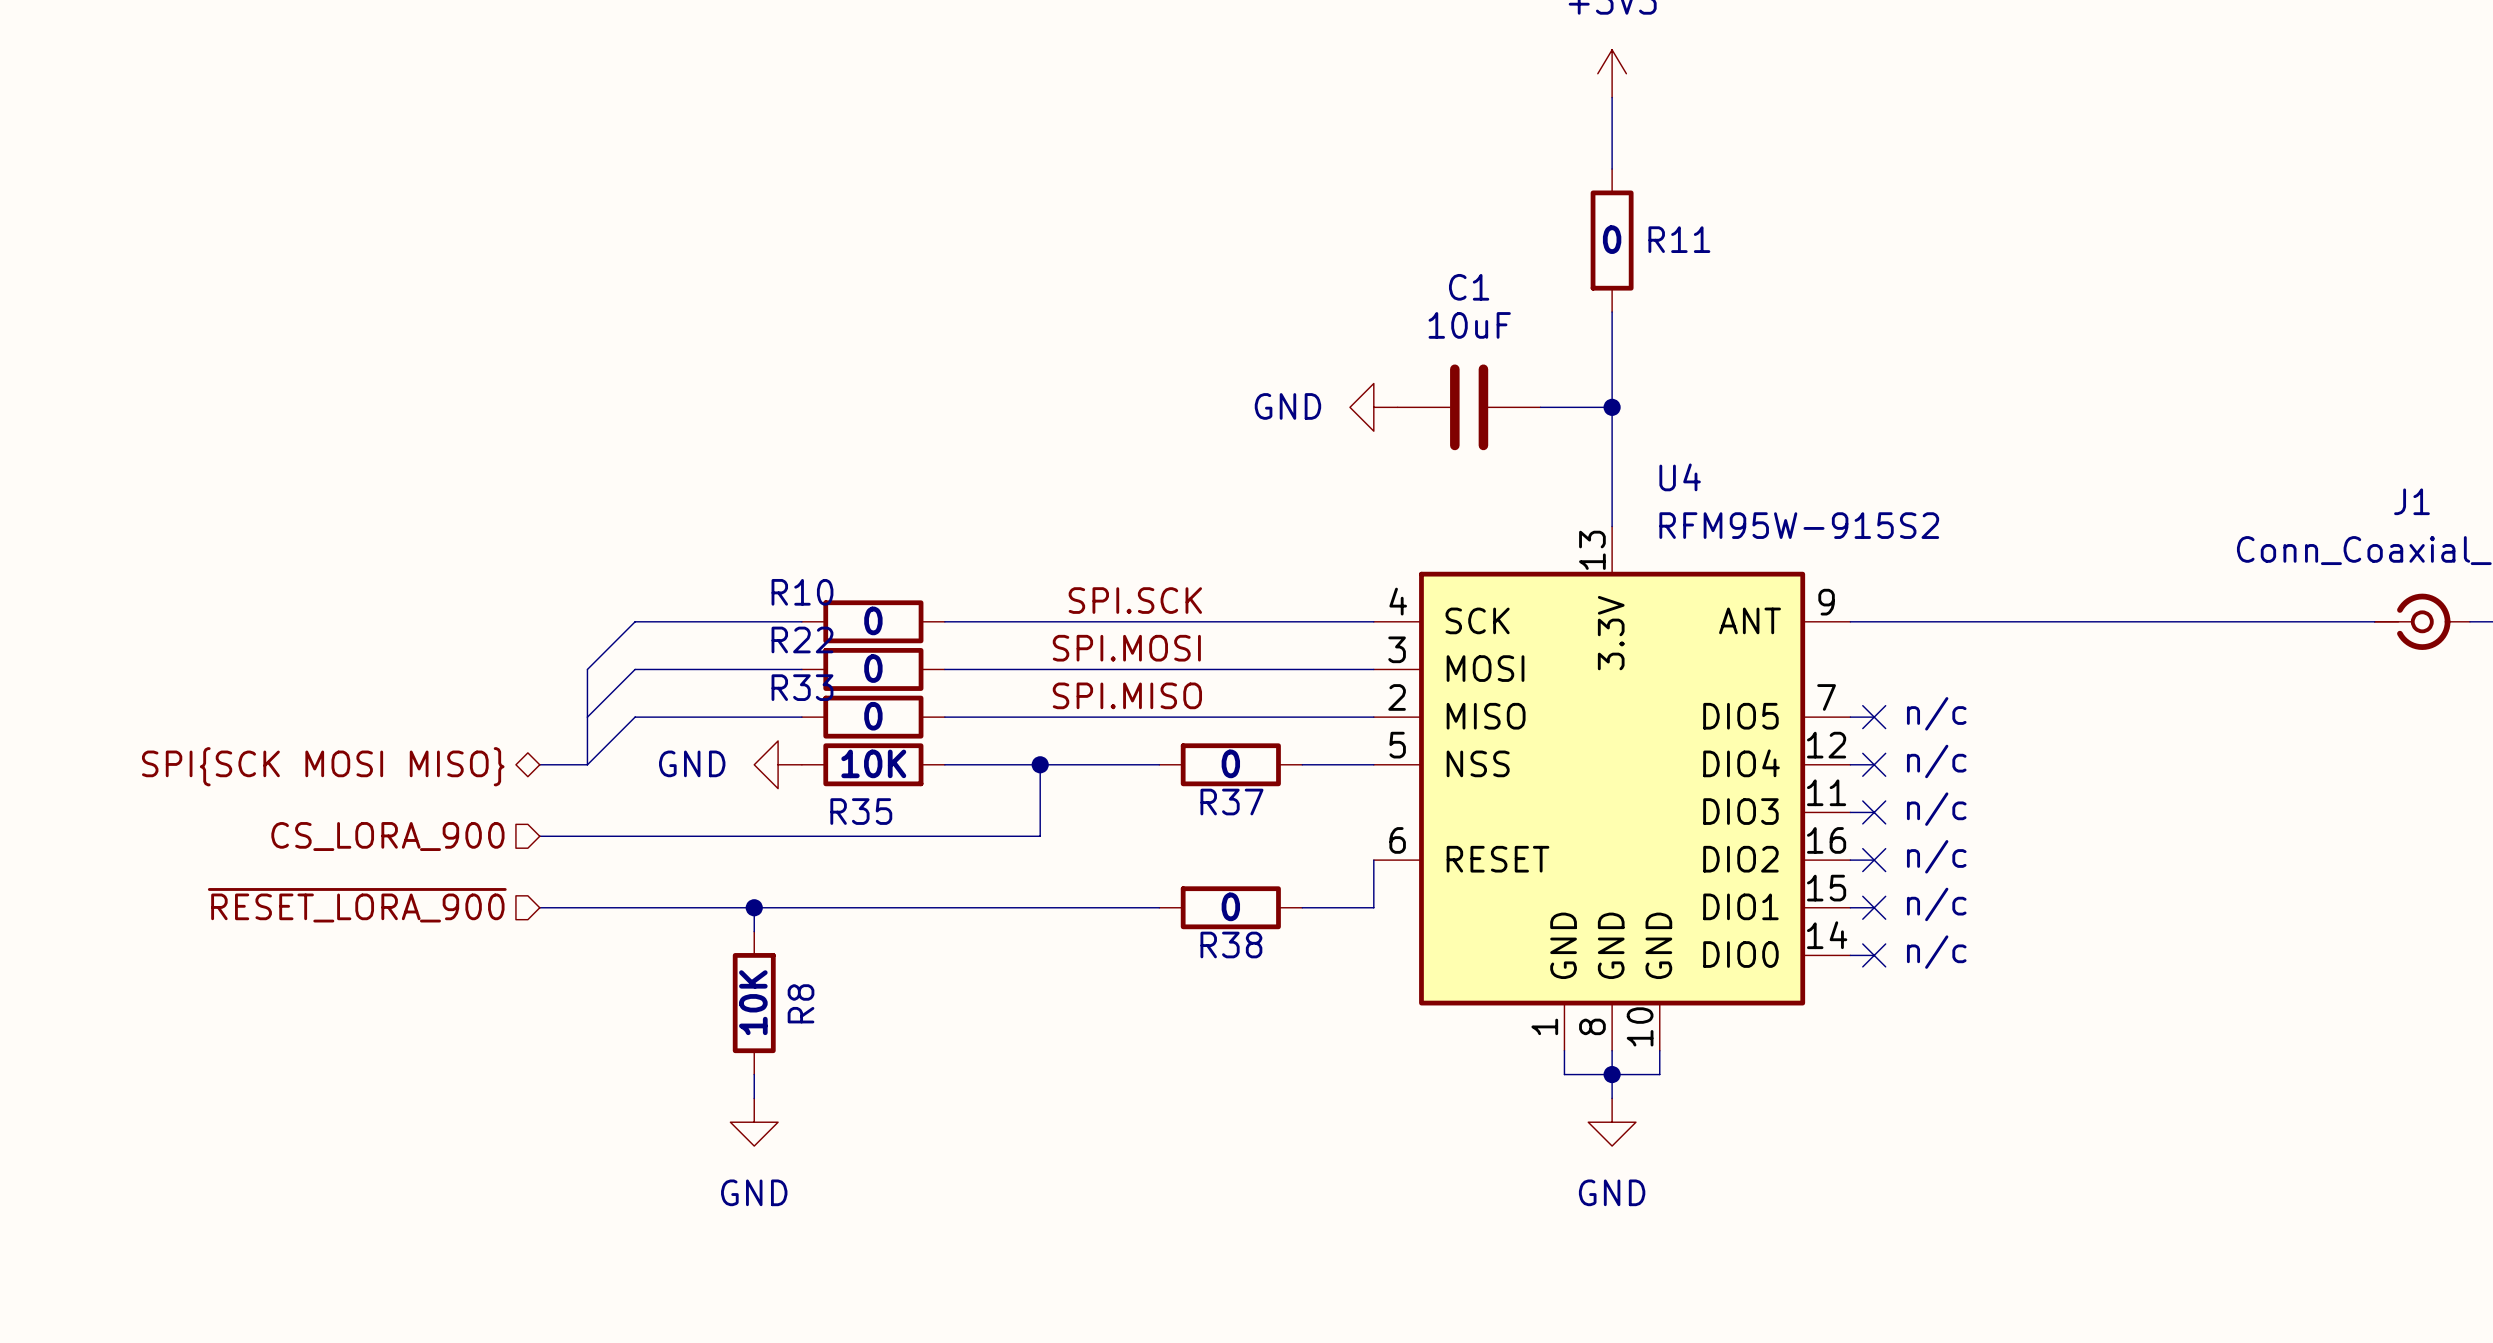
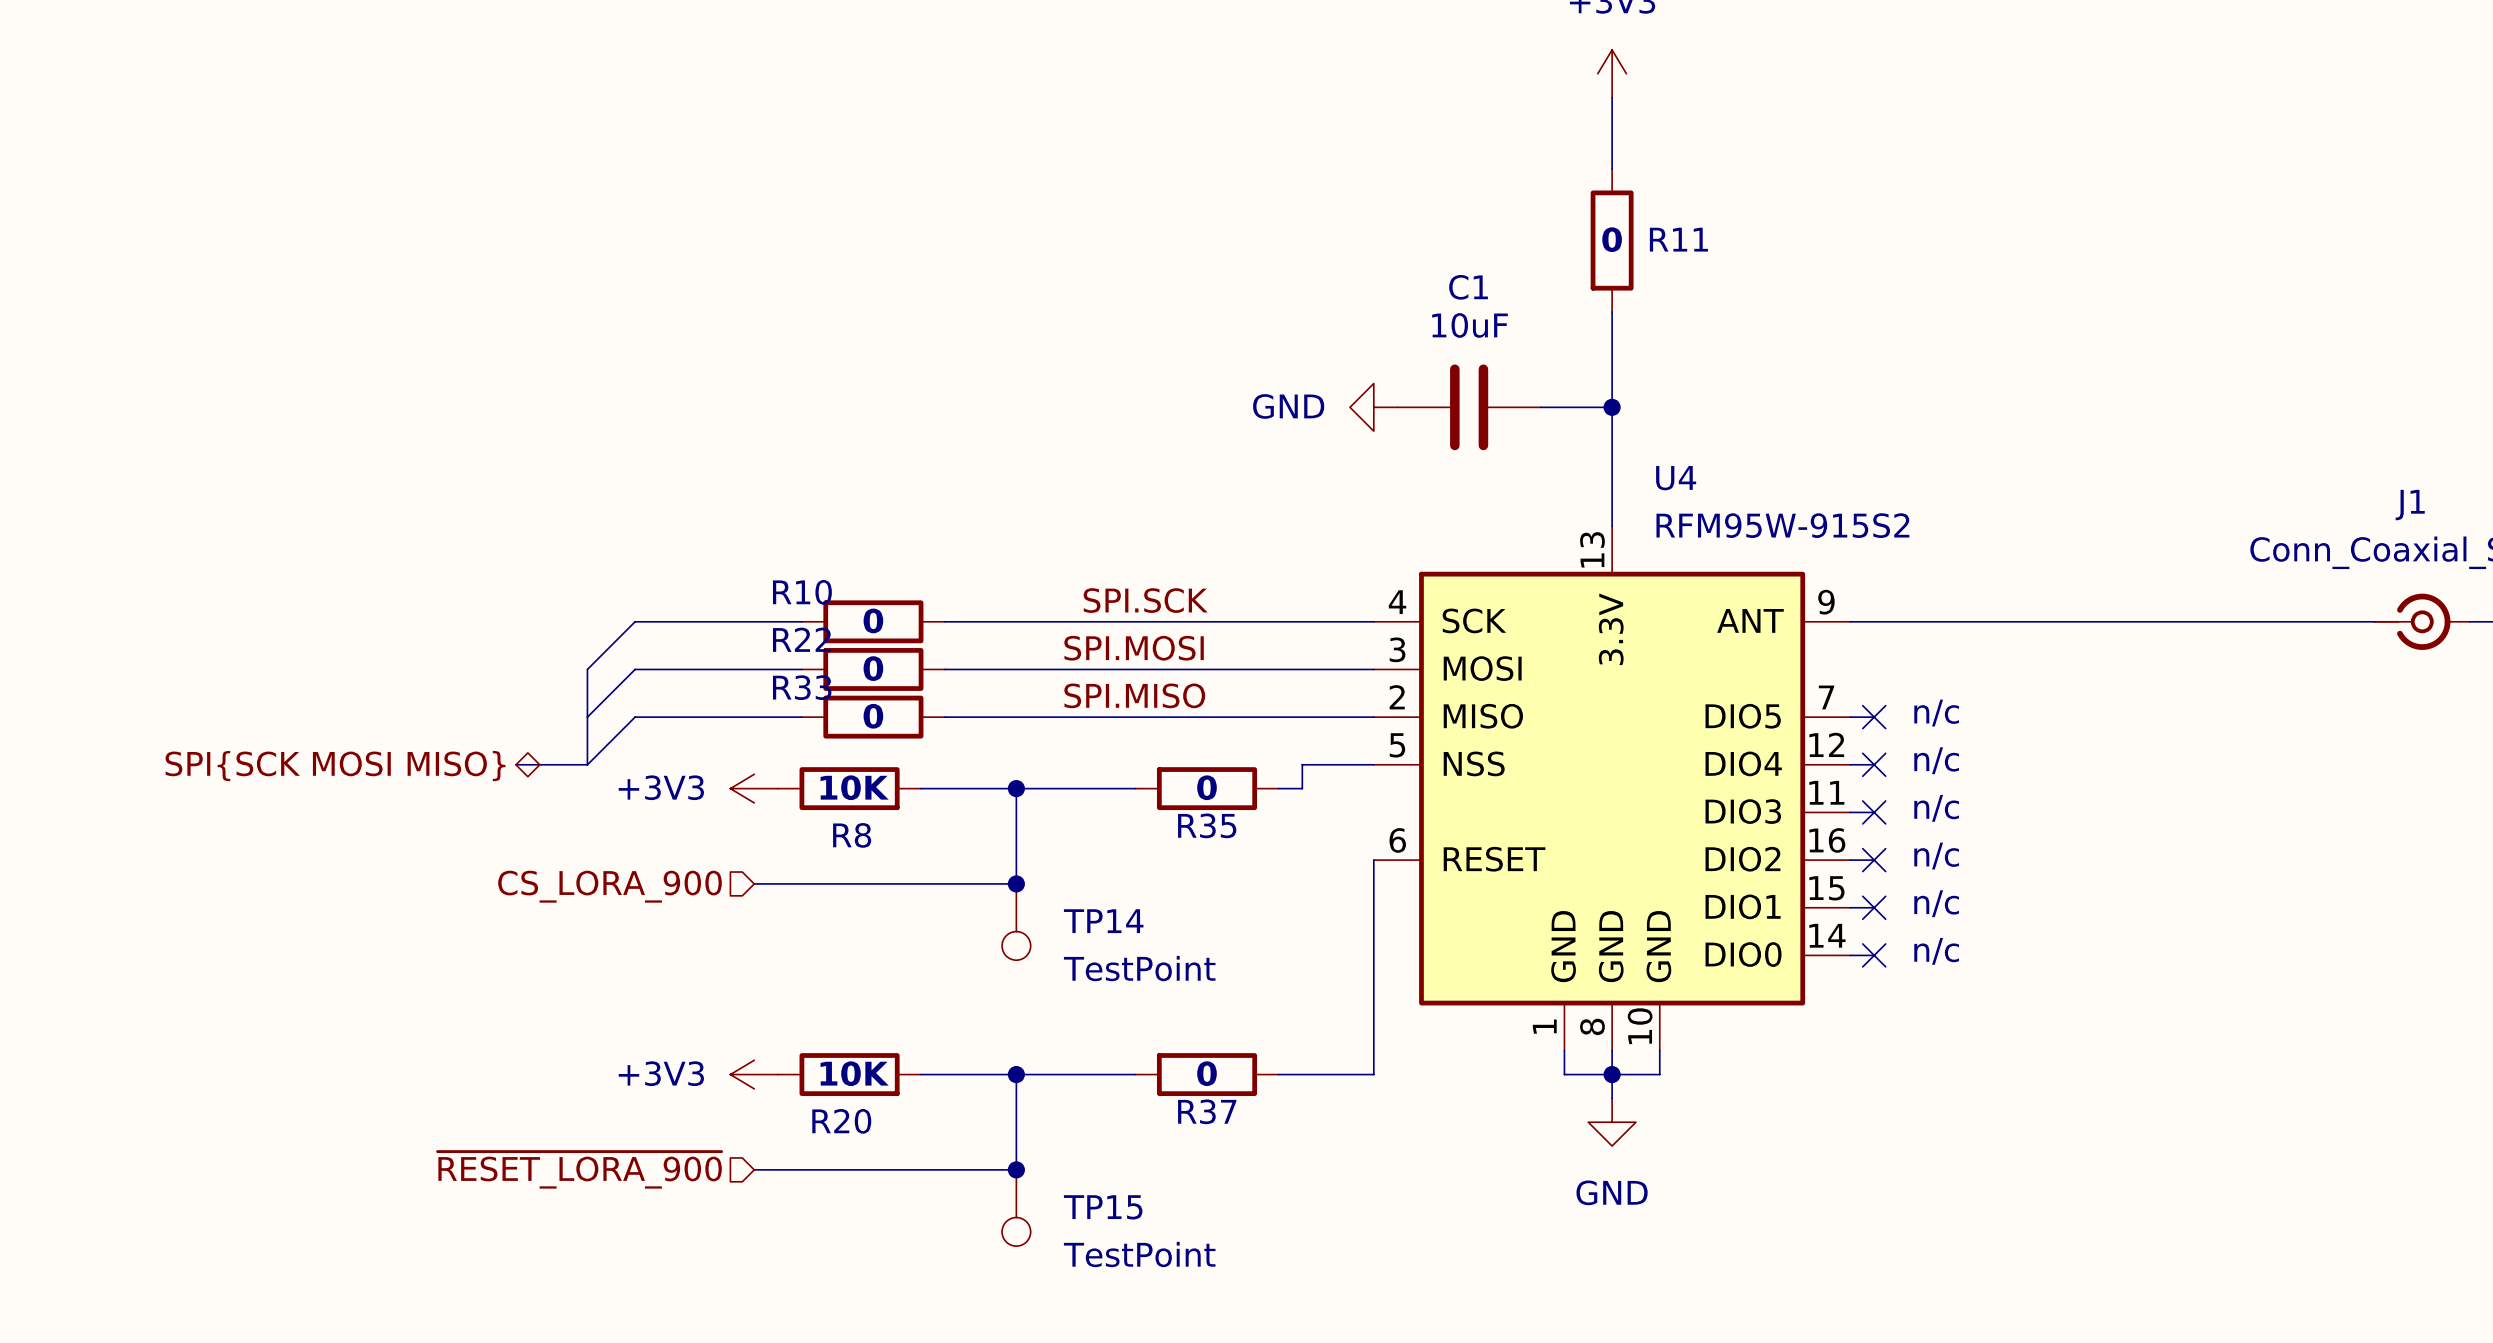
R35 value: 10K (873, 763) -> 0 (1207, 787)
bus: none -> (515, 764) (539, 764)
power symbol: GND (778, 764) -> none
R35 position: (873, 764) -> (1207, 788)
wire: (944, 764) (1159, 764) -> (921, 788) (1135, 788)
wire: (1040, 764) (1040, 836) (539, 836) -> none
junction position: (1040, 764) -> (1016, 788)
R37 position: (1230, 764) -> (1207, 1074)
wire: none -> (1302, 764) (1302, 788) (1278, 788)
power symbol: none -> +3V3 (754, 788)
wire: none -> (1016, 788) (1016, 883) (754, 883)
R35 name position: R35 (861, 811) -> R35 (1207, 825)
hierarchical label position: CS_LORA_900 (387, 836) -> CS_LORA_900 (609, 886)
junction: none -> (1016, 883)
hierarchical label position: ~{RESET_LORA_900} (357, 905) -> ~{RESET_LORA_900} (579, 1170)
wire: (539, 907) (1159, 907) -> none
wire: (754, 907) (754, 931) -> none
junction: (754, 907) -> none
R38: 0 (1230, 907) -> none
wire: (1302, 907) (1373, 907) -> (1278, 1074) (1373, 1074) (1373, 907)
TP14: none -> TestPoint (1016, 922)
R8 rotation: 0° (754, 1003) -> 90° clockwise (849, 788)
R8 position: (754, 1003) -> (849, 788)
wire: (754, 1074) (754, 1098) -> none
power symbol: none -> +3V3 (754, 1074)
R20: none -> 10K (849, 1074)
wire: none -> (921, 1074) (1135, 1074)
wire: none -> (1016, 1074) (1016, 1169) (754, 1169)
junction: none -> (1016, 1074)
power symbol: GND (754, 1122) -> none
junction: none -> (1016, 1169)
TP15: none -> TestPoint (1016, 1208)

